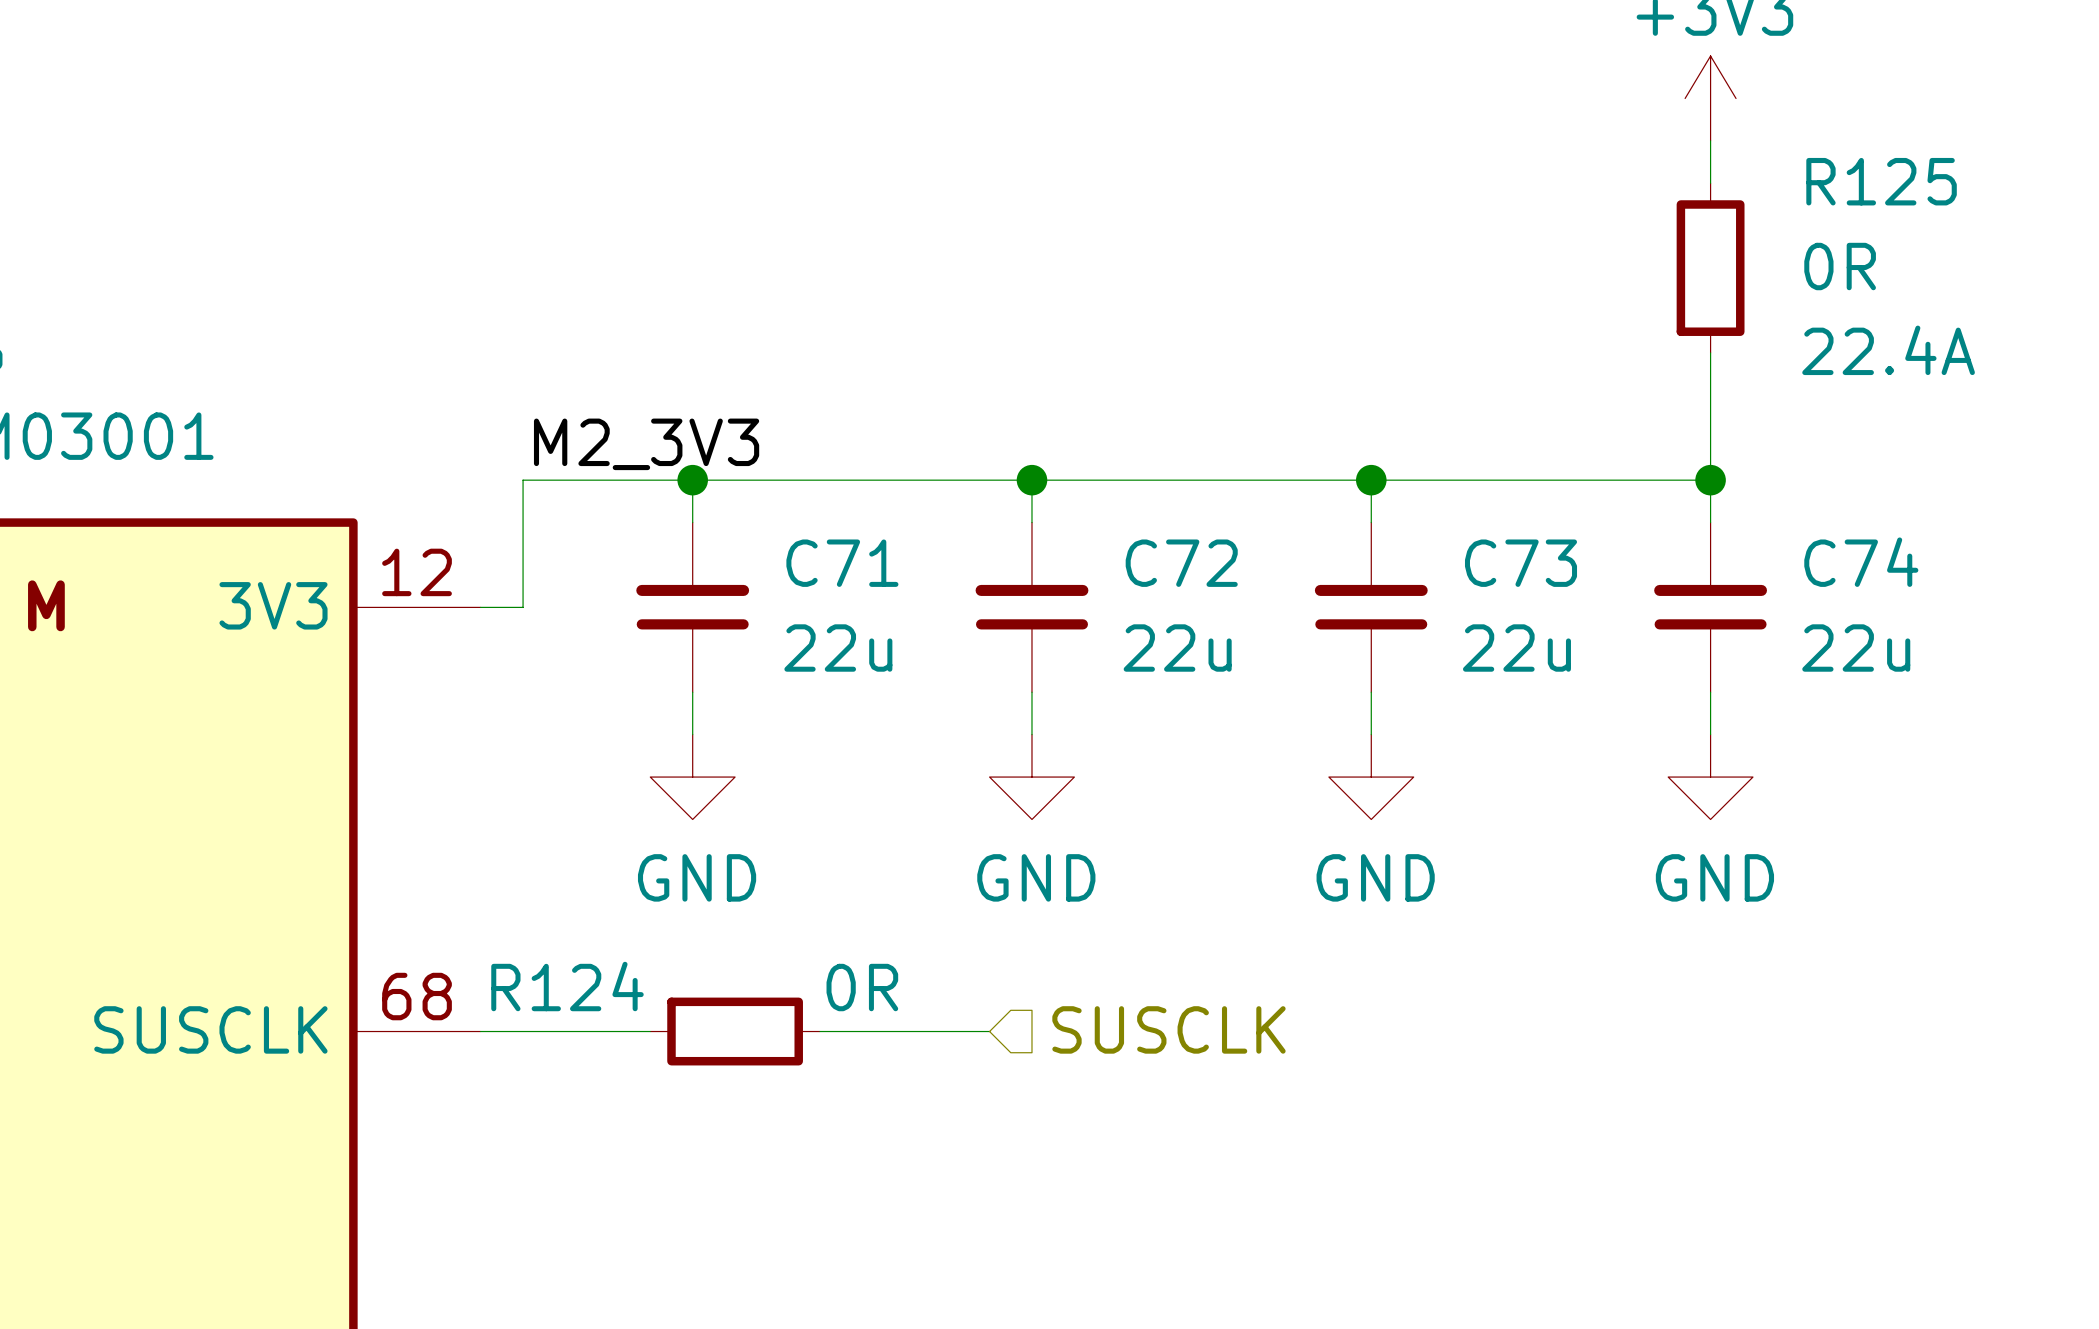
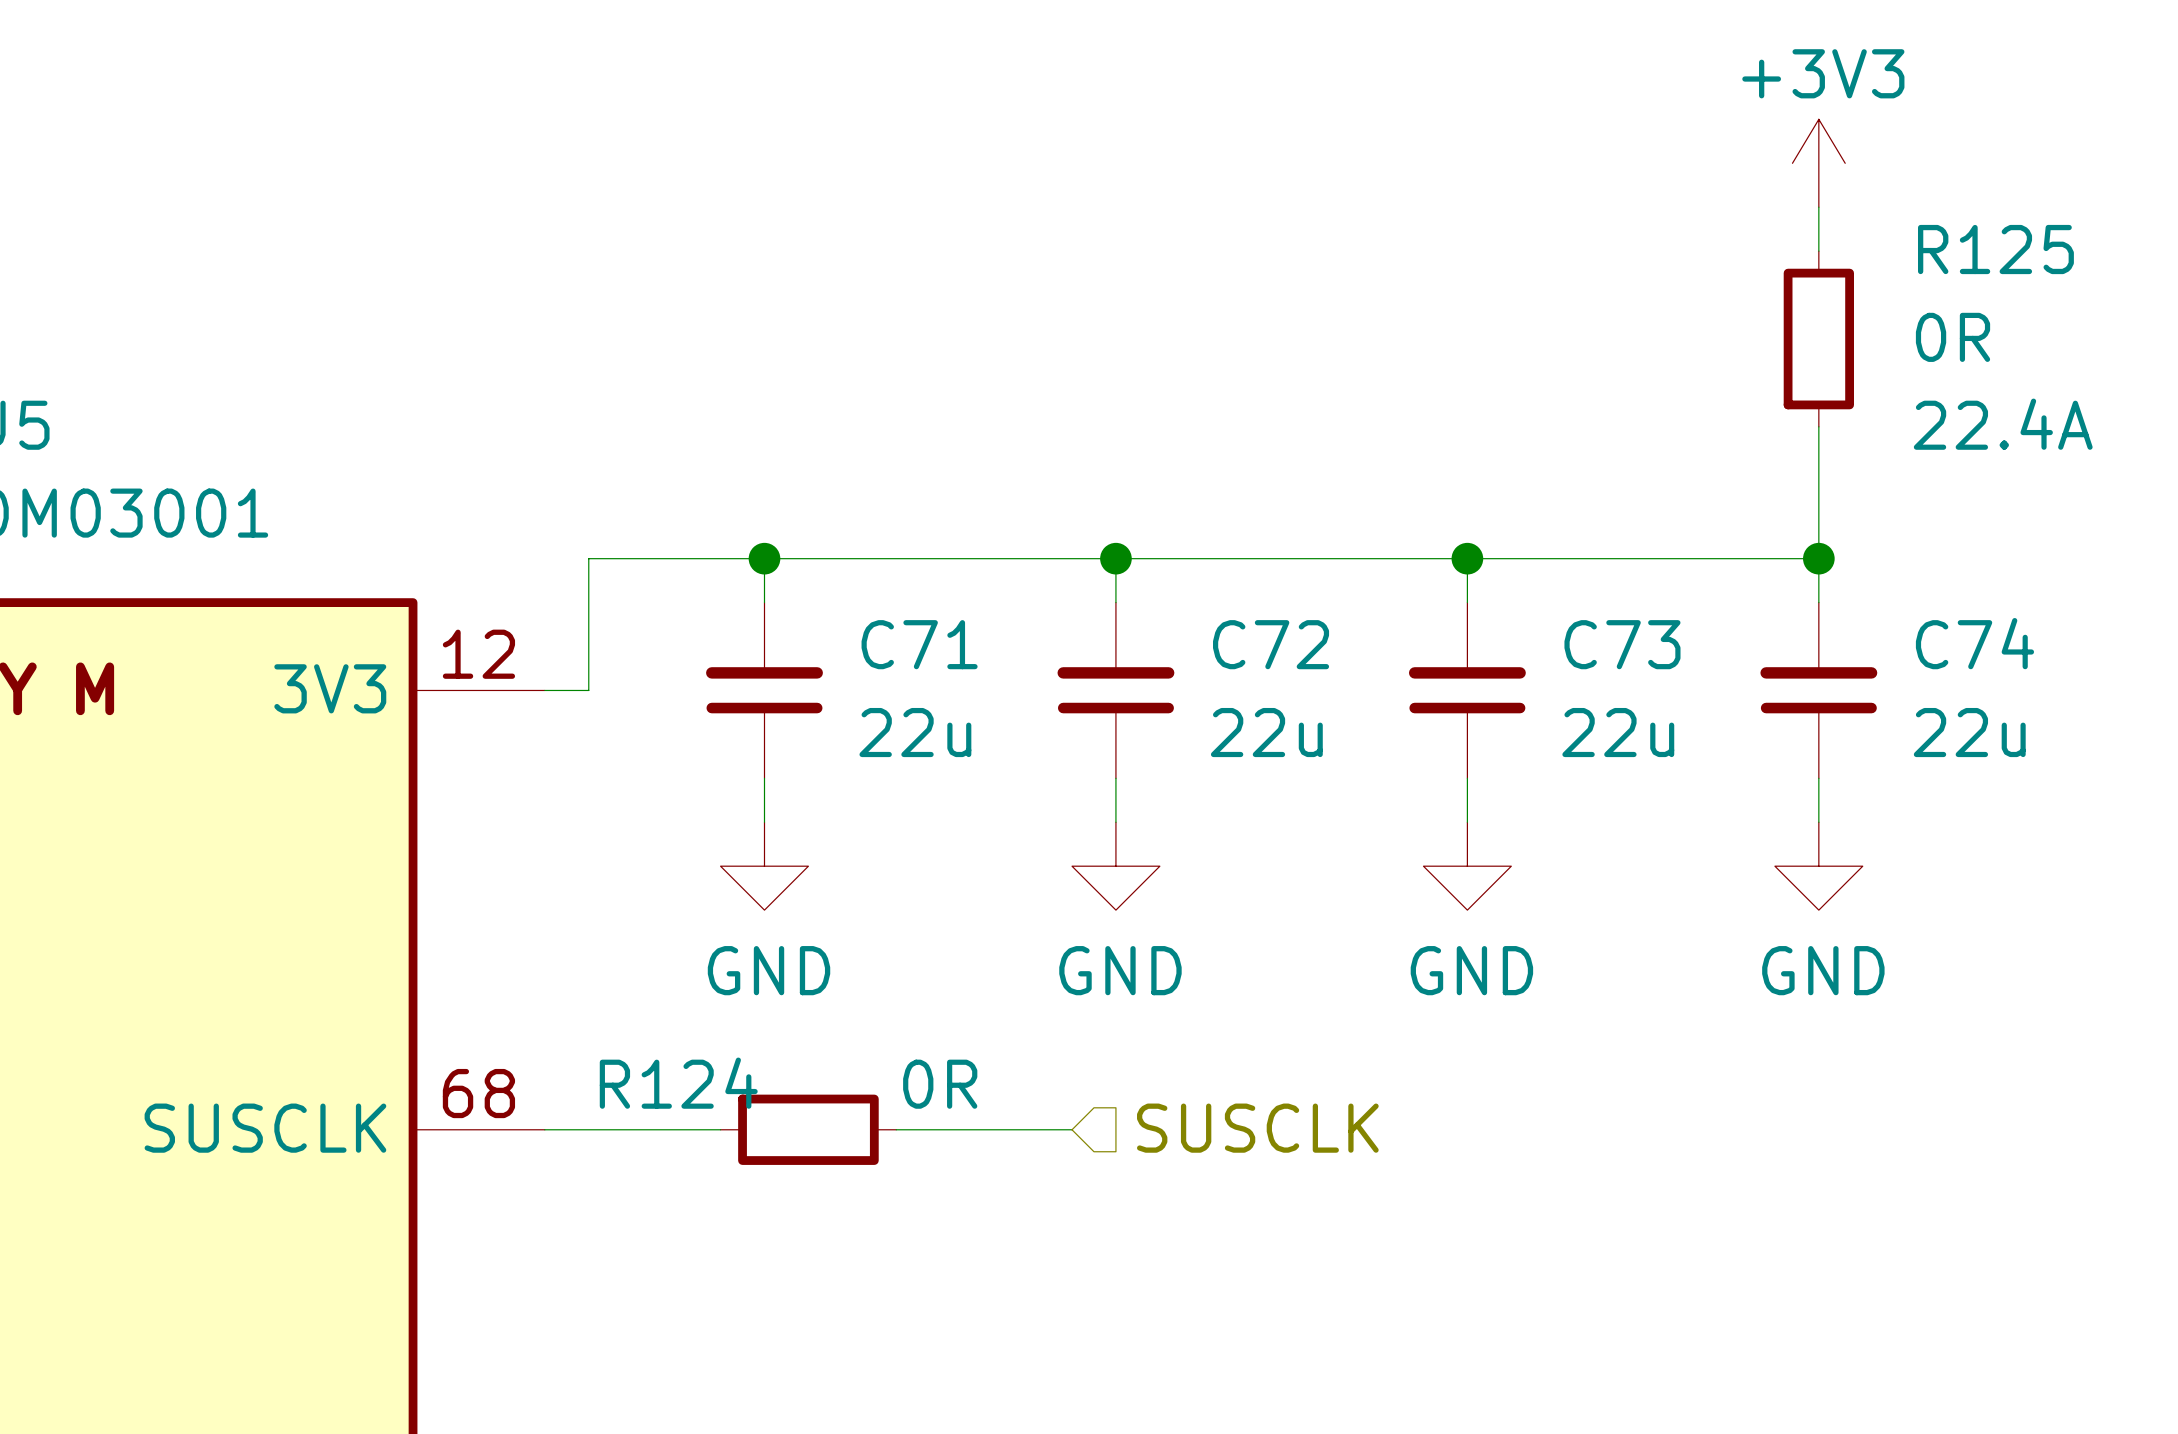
label: M2_3V3 (646, 444) -> none
R124 name position: R124 (567, 986) -> R124 (678, 1083)

